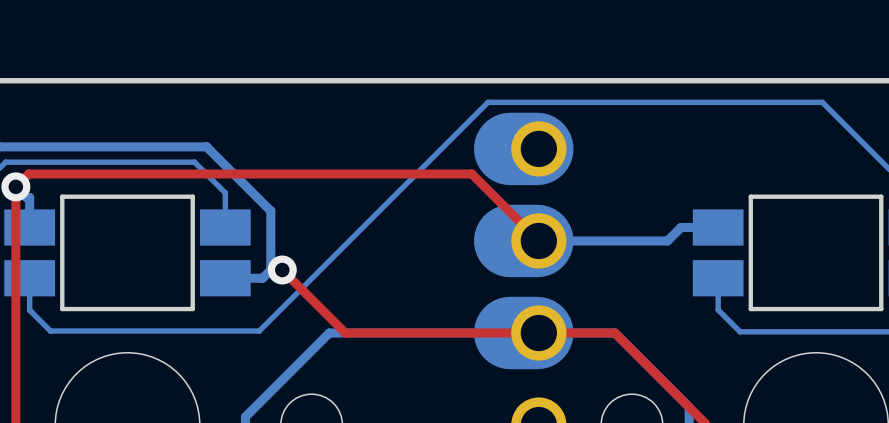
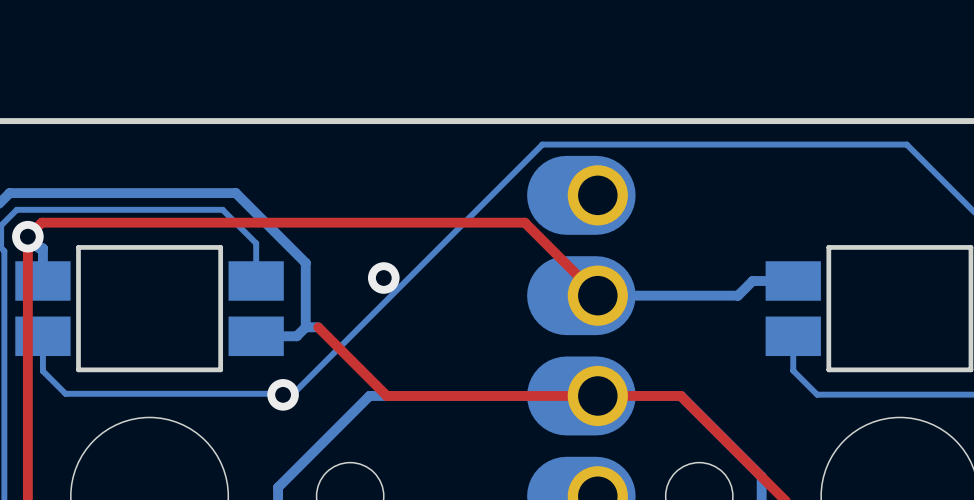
via: none -> (383, 278)
via: (282, 269) -> none
via: none -> (283, 394)

